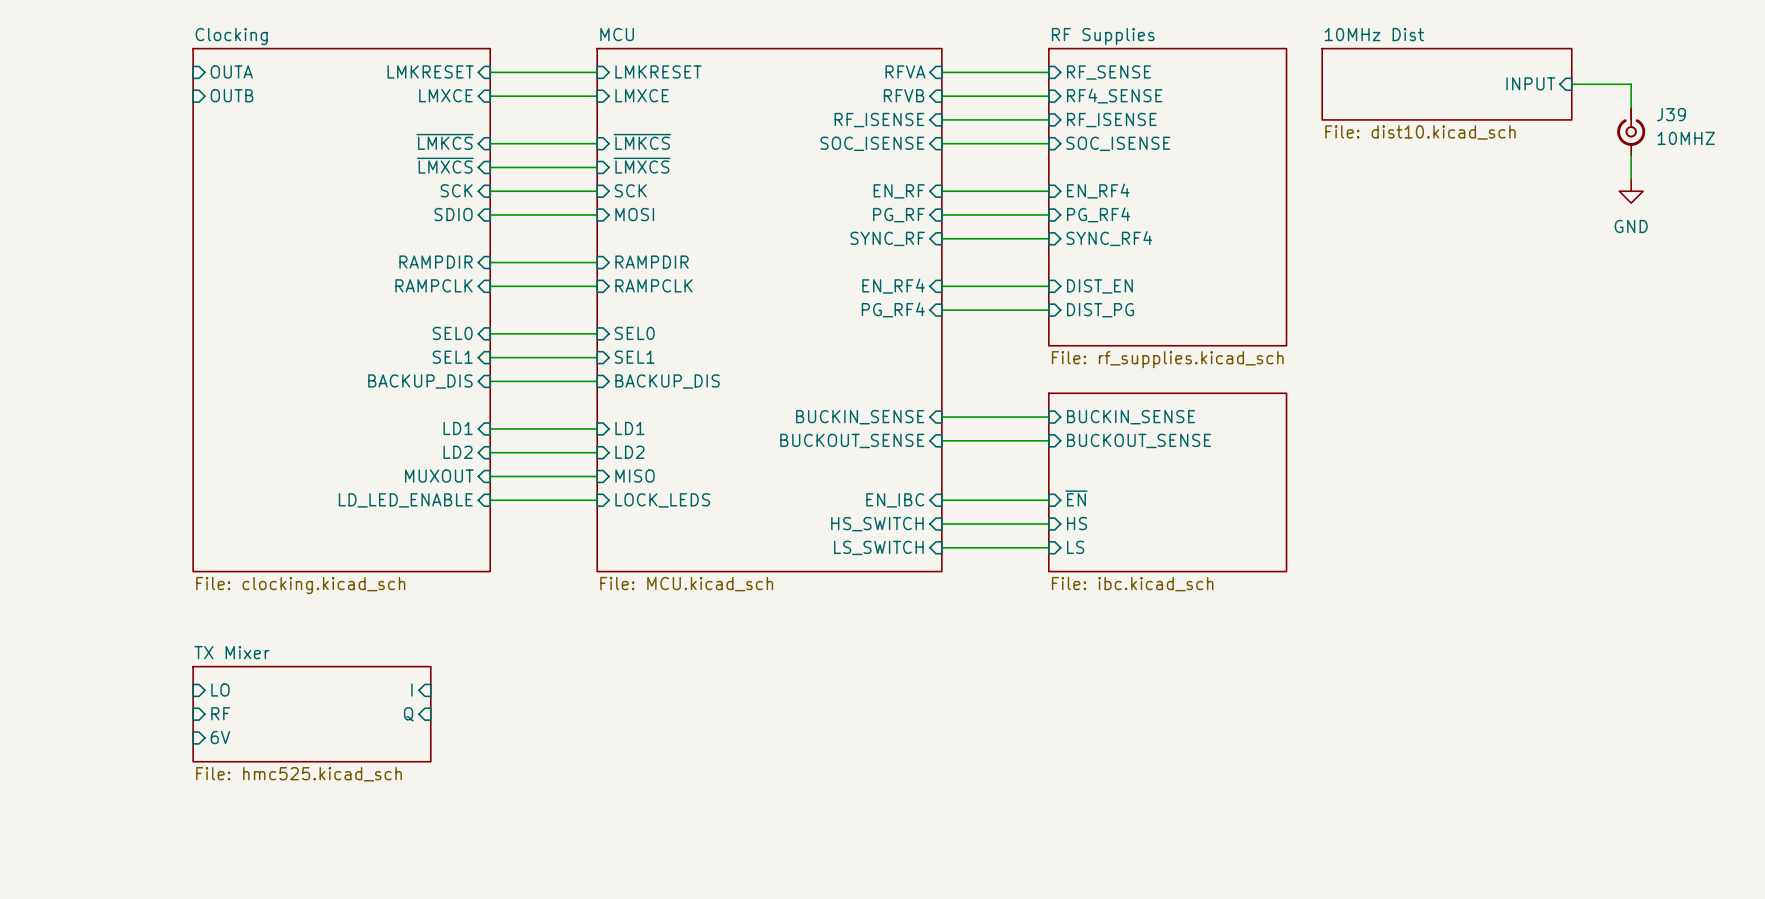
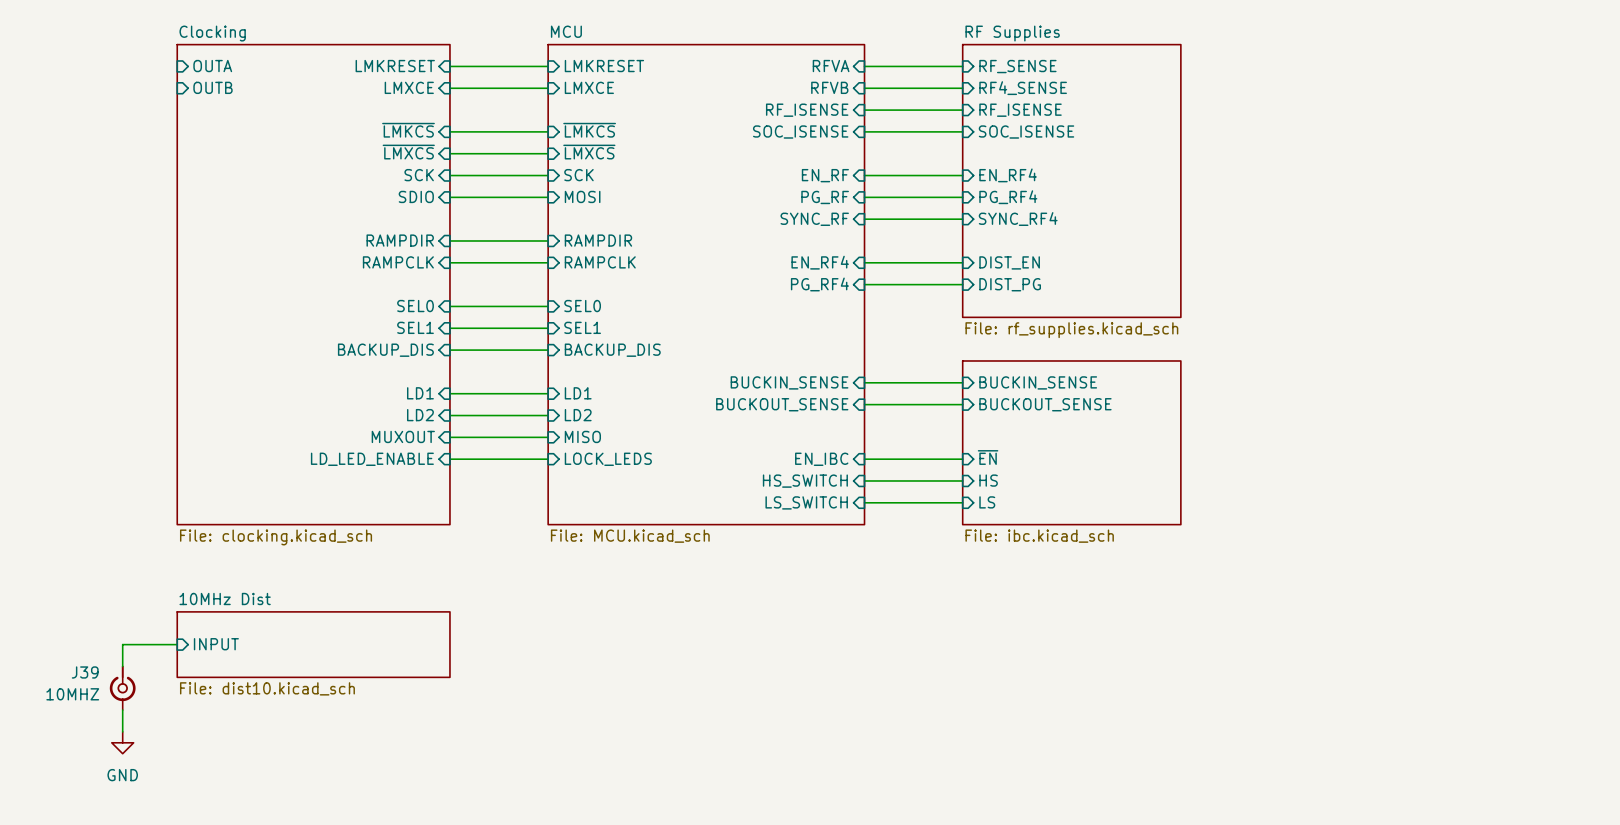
sheet 10MHz Dist name position: 10MHz Dist (1374, 34) -> 10MHz Dist (225, 598)
sheet 10MHz Dist shape: [1321, 47, 1573, 121] -> [176, 611, 451, 679]
sheet pin: INPUT (1530, 83) -> none
wire: (1571, 84) (1631, 84) (1631, 108) -> none
J39 name position: J39 (1671, 114) -> J39 (85, 672)
J39 position: (1631, 131) -> (122, 688)
sheet 10MHz Dist value position: File: dist10.kicad_sch (1420, 132) -> File: dist10.kicad_sch (267, 688)
J39 value position: 10MHZ (1686, 138) -> 10MHZ (72, 694)
wire: (1631, 155) (1631, 179) -> none
power symbol: GND (1631, 191) -> none
sheet pin: LO (220, 689) -> none
sheet pin: I (411, 689) -> none
sheet pin: none -> INPUT (216, 644)
wire: none -> (177, 644) (122, 644) (122, 666)
sheet pin: RF (220, 713) -> none
sheet TX Mixer: File: hmc525.kicad_sch (311, 714) -> none
sheet pin: Q (408, 714) -> none
sheet pin: 6V (220, 737) -> none
wire: none -> (122, 710) (122, 731)
power symbol: none -> GND (122, 742)

